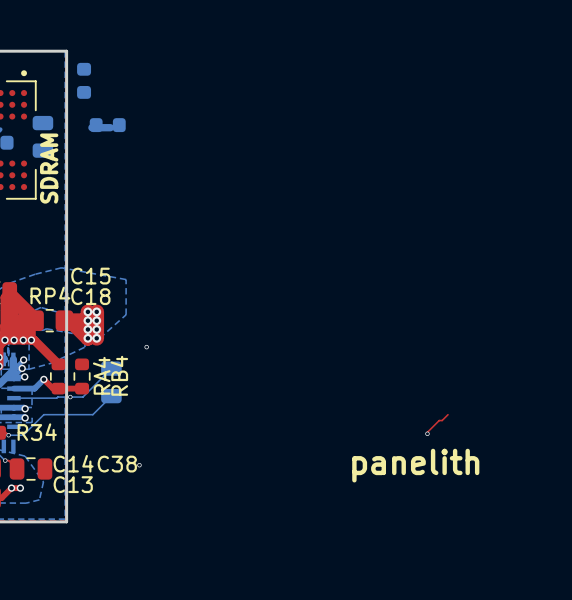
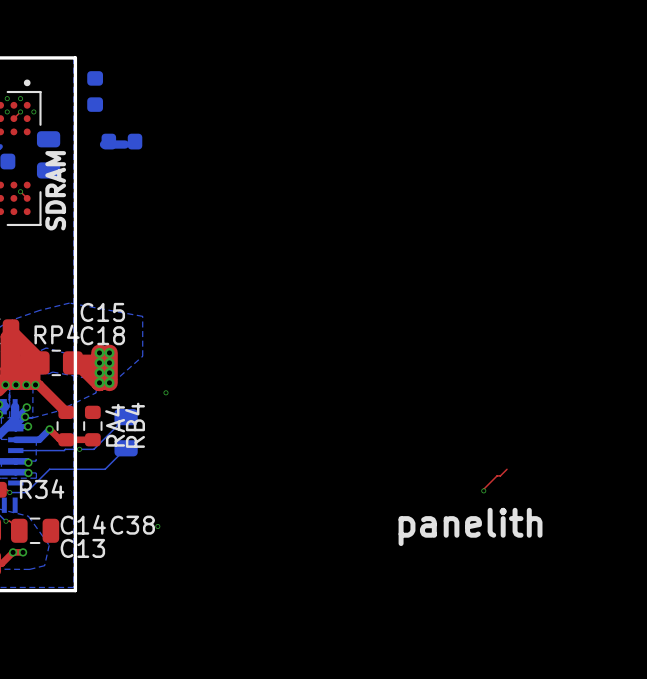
via: none -> (7, 98)
via: none -> (20, 98)
via: none -> (7, 111)
top track: none -> (20, 111) (13, 118)
via: none -> (20, 111)
via: none -> (33, 111)
top track: none -> (20, 191) (27, 198)
via: none -> (20, 191)

